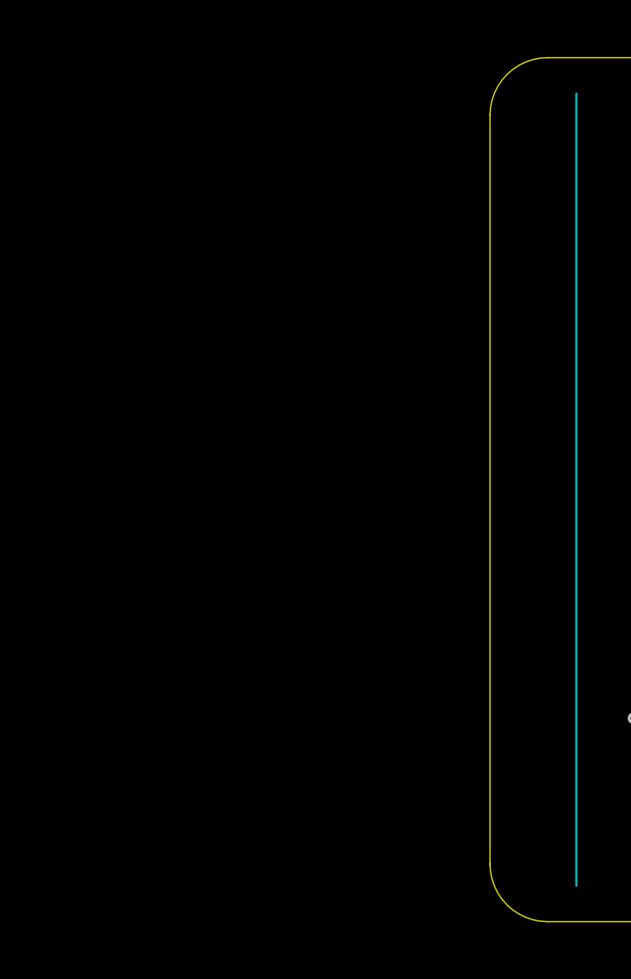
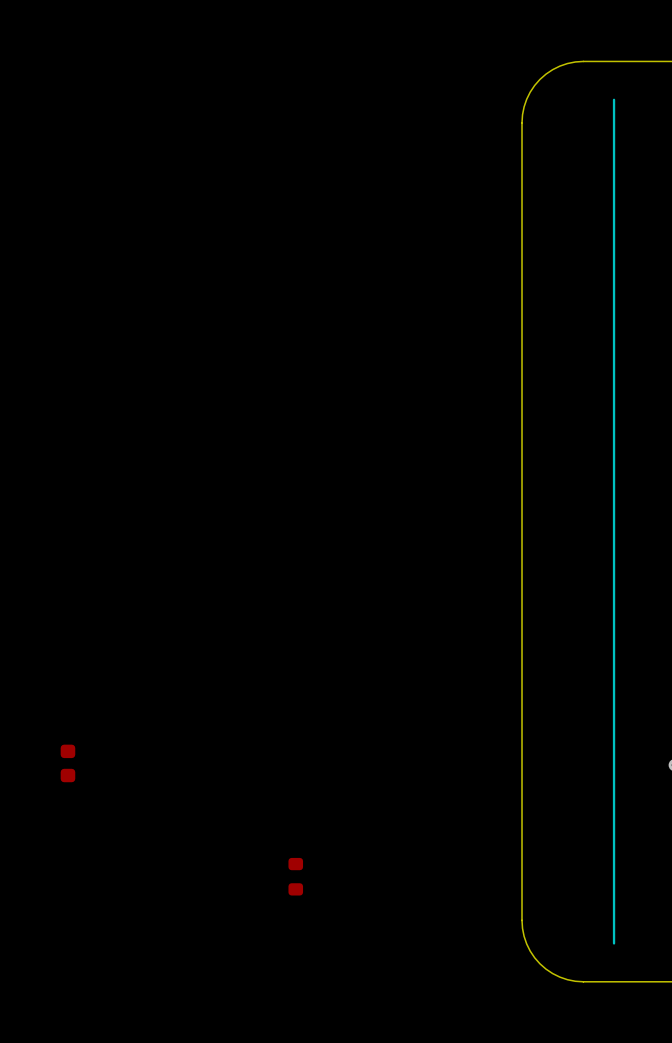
part: none -> (67, 763)
part: none -> (295, 876)

